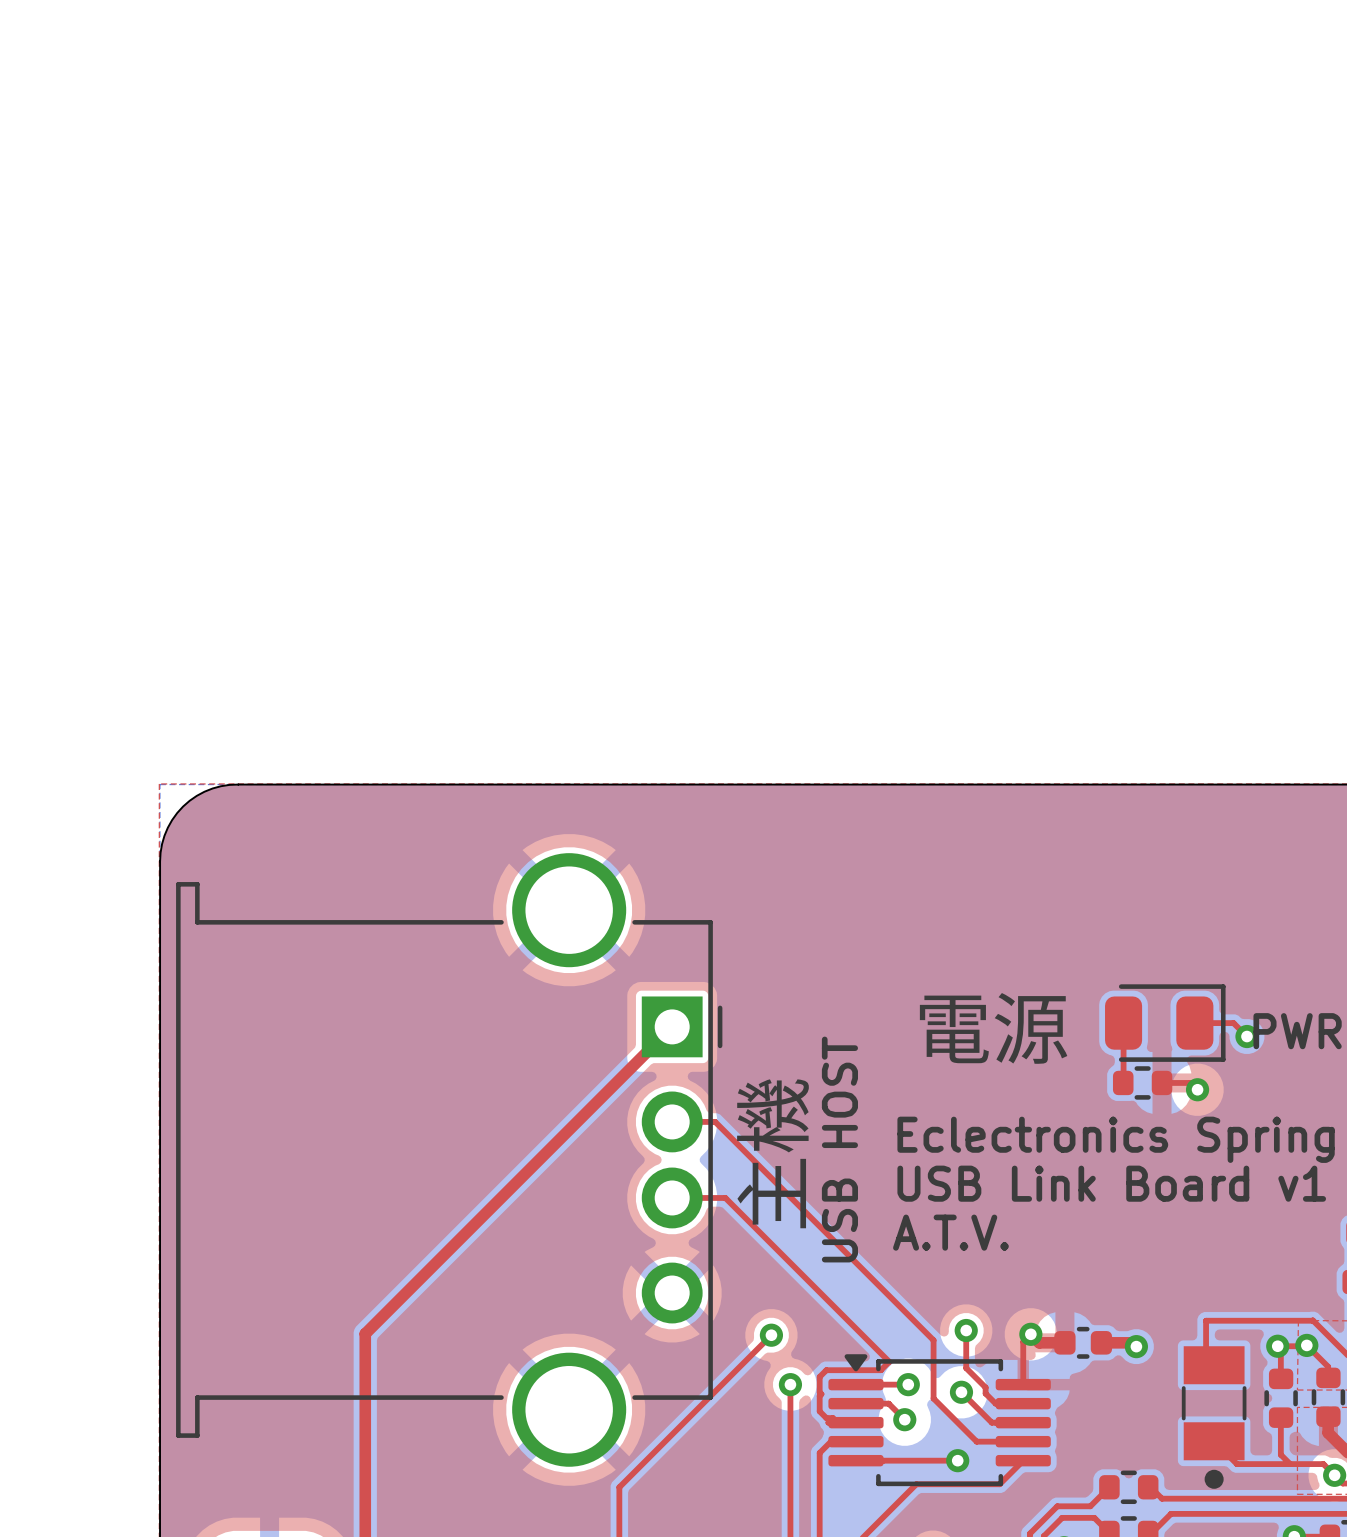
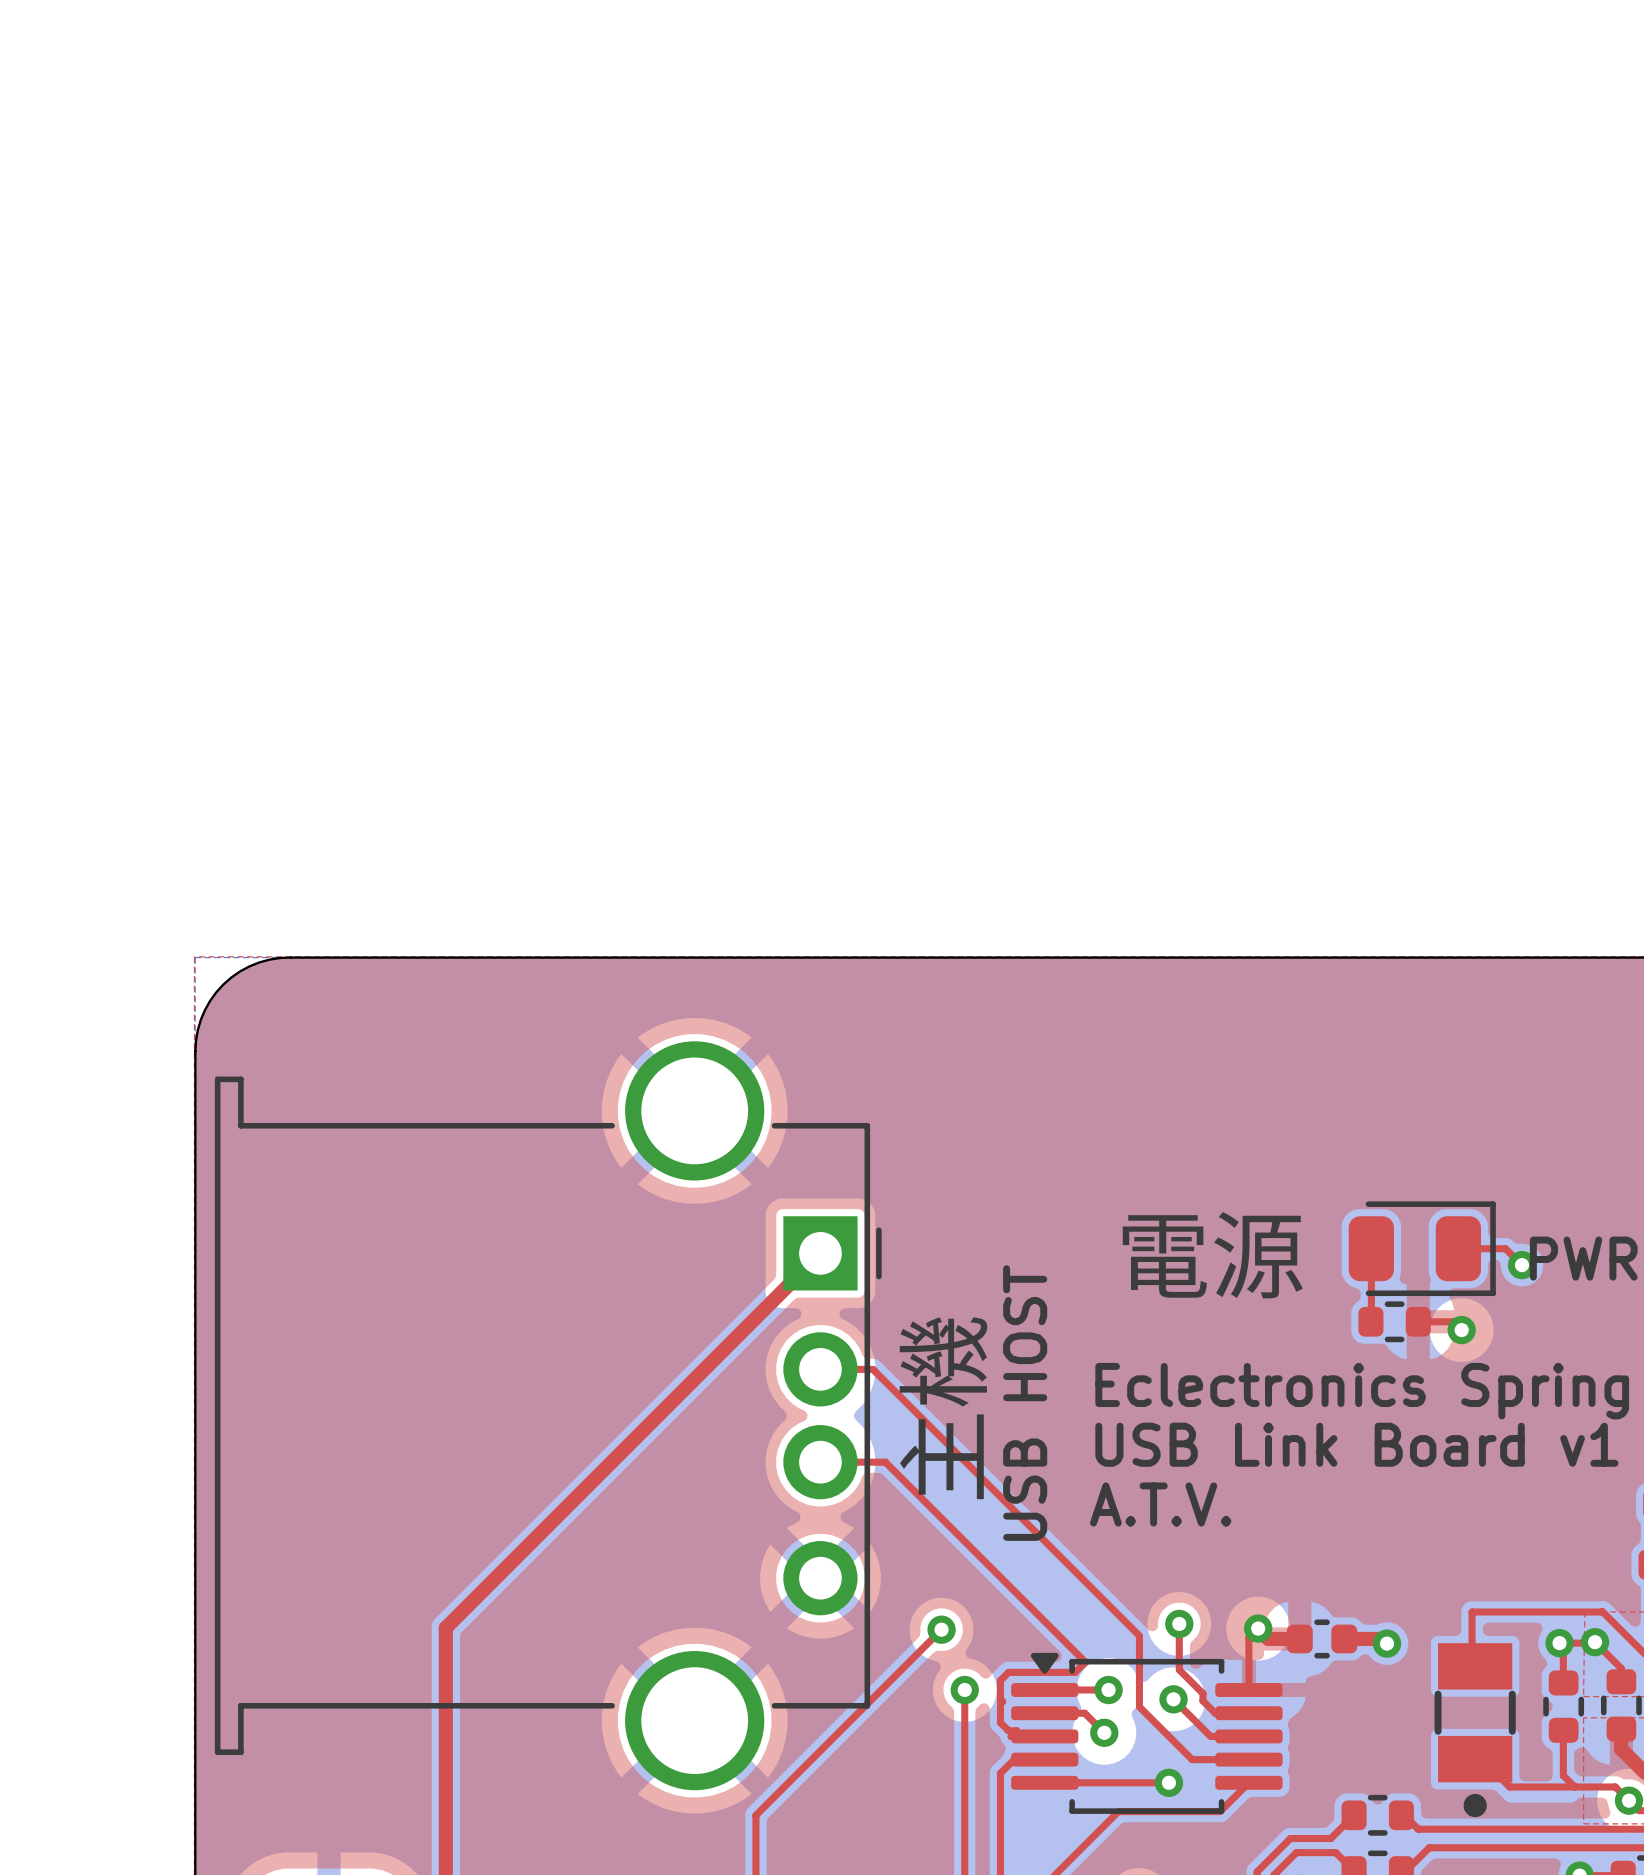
part footprint: [1181, 1346, 1247, 1489] -> [1434, 1643, 1516, 1818]

